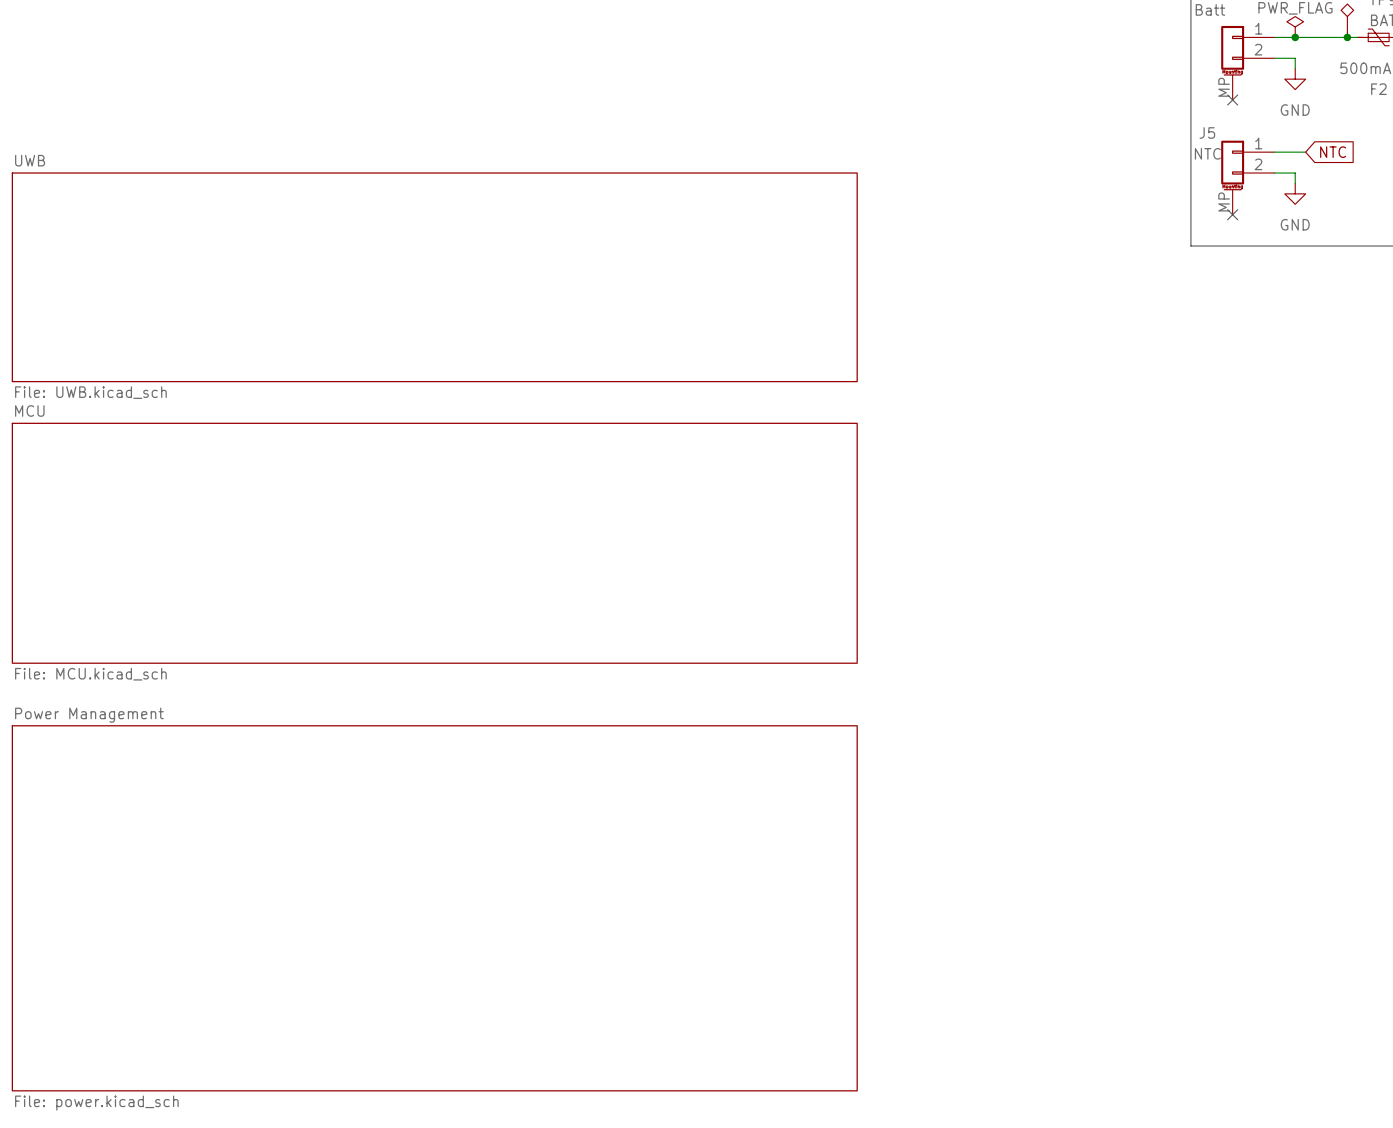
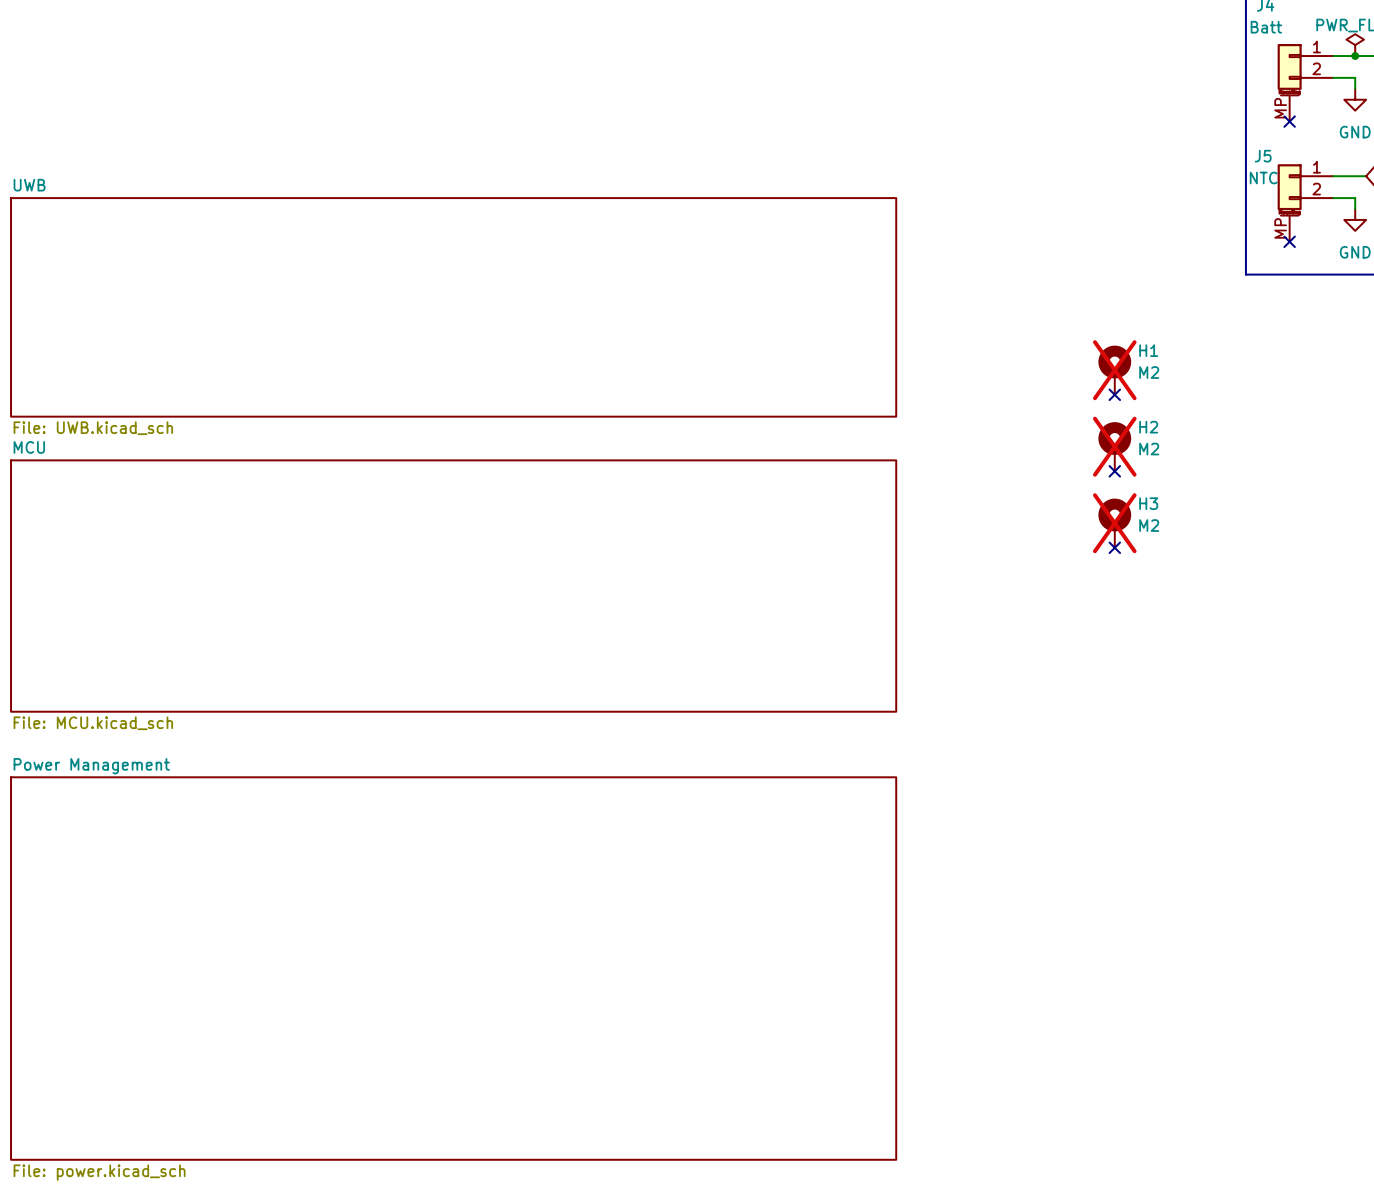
H1: none -> M2 (1114, 370)
no-connect mark: none -> (1114, 394)
H2: none -> M2 (1114, 446)
no-connect mark: none -> (1114, 471)
H3: none -> M2 (1114, 523)
no-connect mark: none -> (1114, 547)

